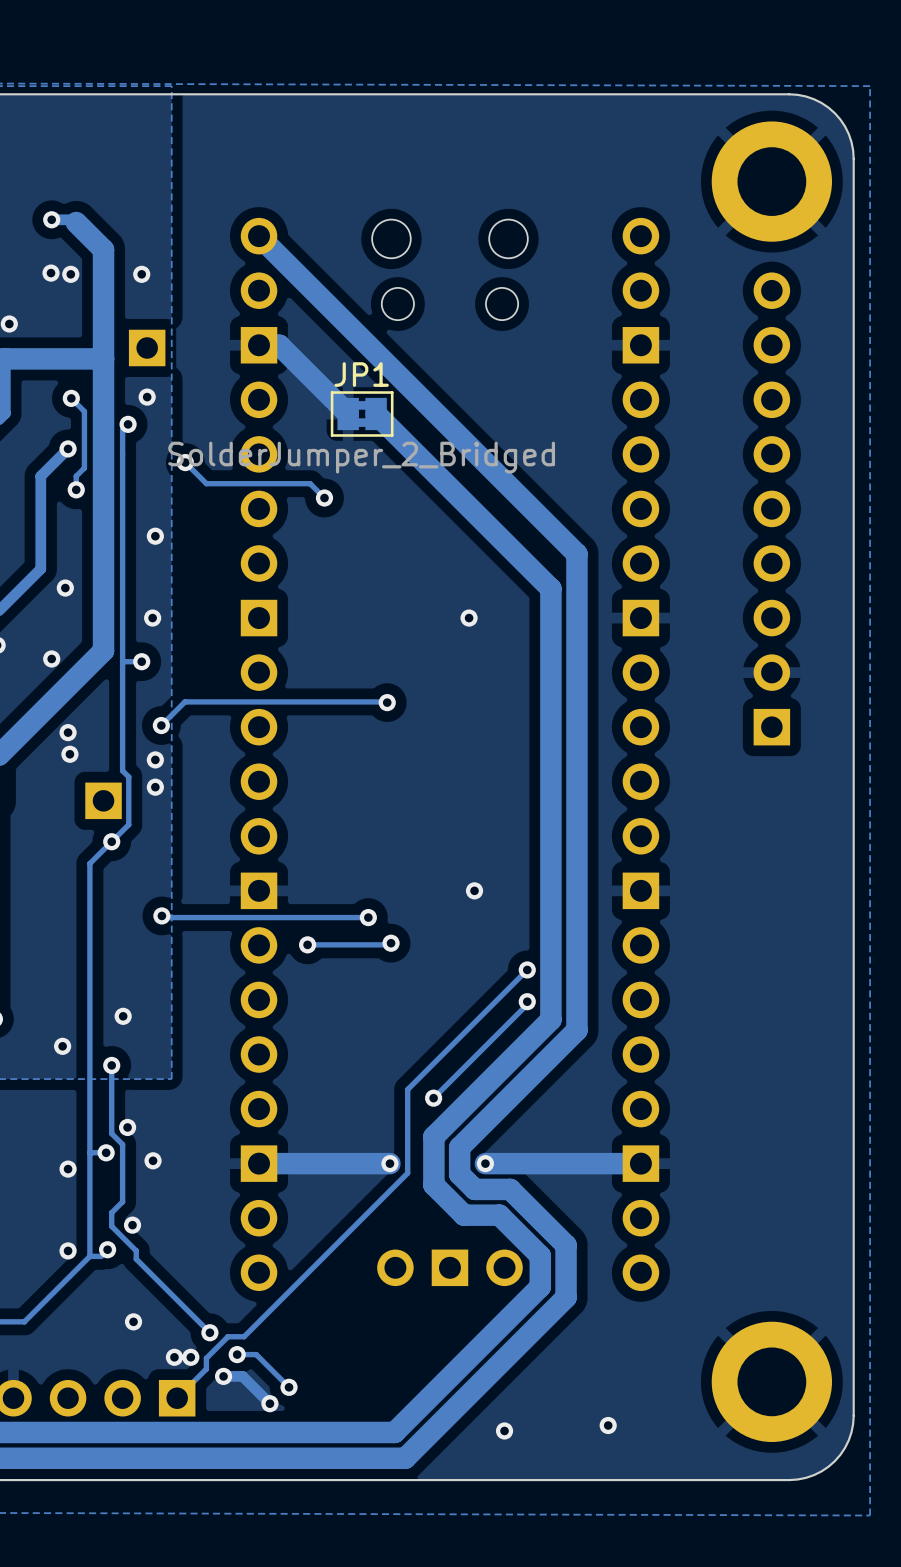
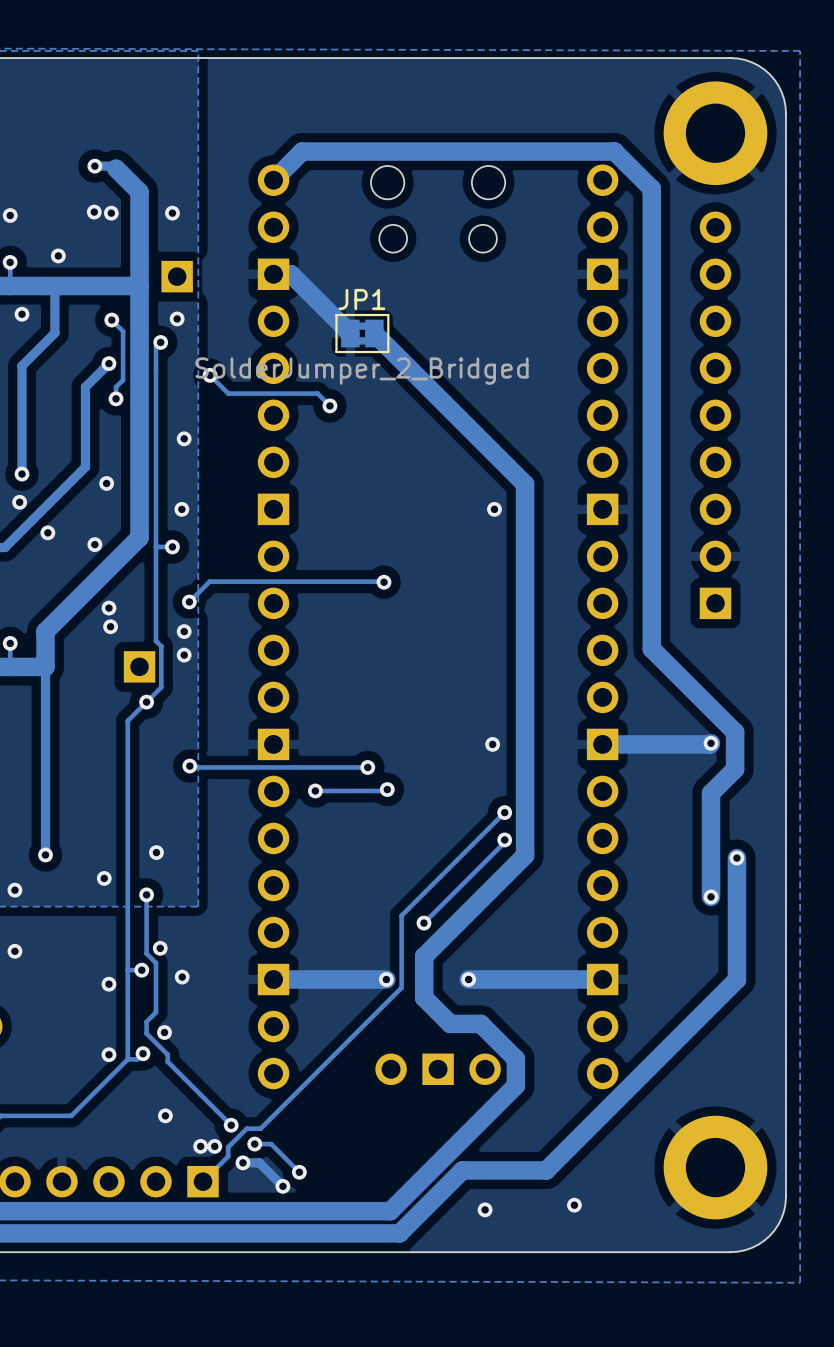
track: (259, 236) (576, 554) (576, 1030) (459, 1147) (459, 1174) (474, 1189) (510, 1189) (566, 1245) (566, 1297) (478, 1385) -> (273, 180) (302, 151) (614, 151) (651, 188) (651, 648) (735, 732) (735, 769) (711, 793) (711, 896)
via position: (469, 618) -> (494, 509)
track: none -> (711, 743) (602, 744)
via: none -> (711, 743)
via position: (474, 890) -> (492, 744)
track: none -> (736, 858) (736, 979) (546, 1170) (462, 1170)
via: none -> (736, 858)
via: none -> (711, 896)

